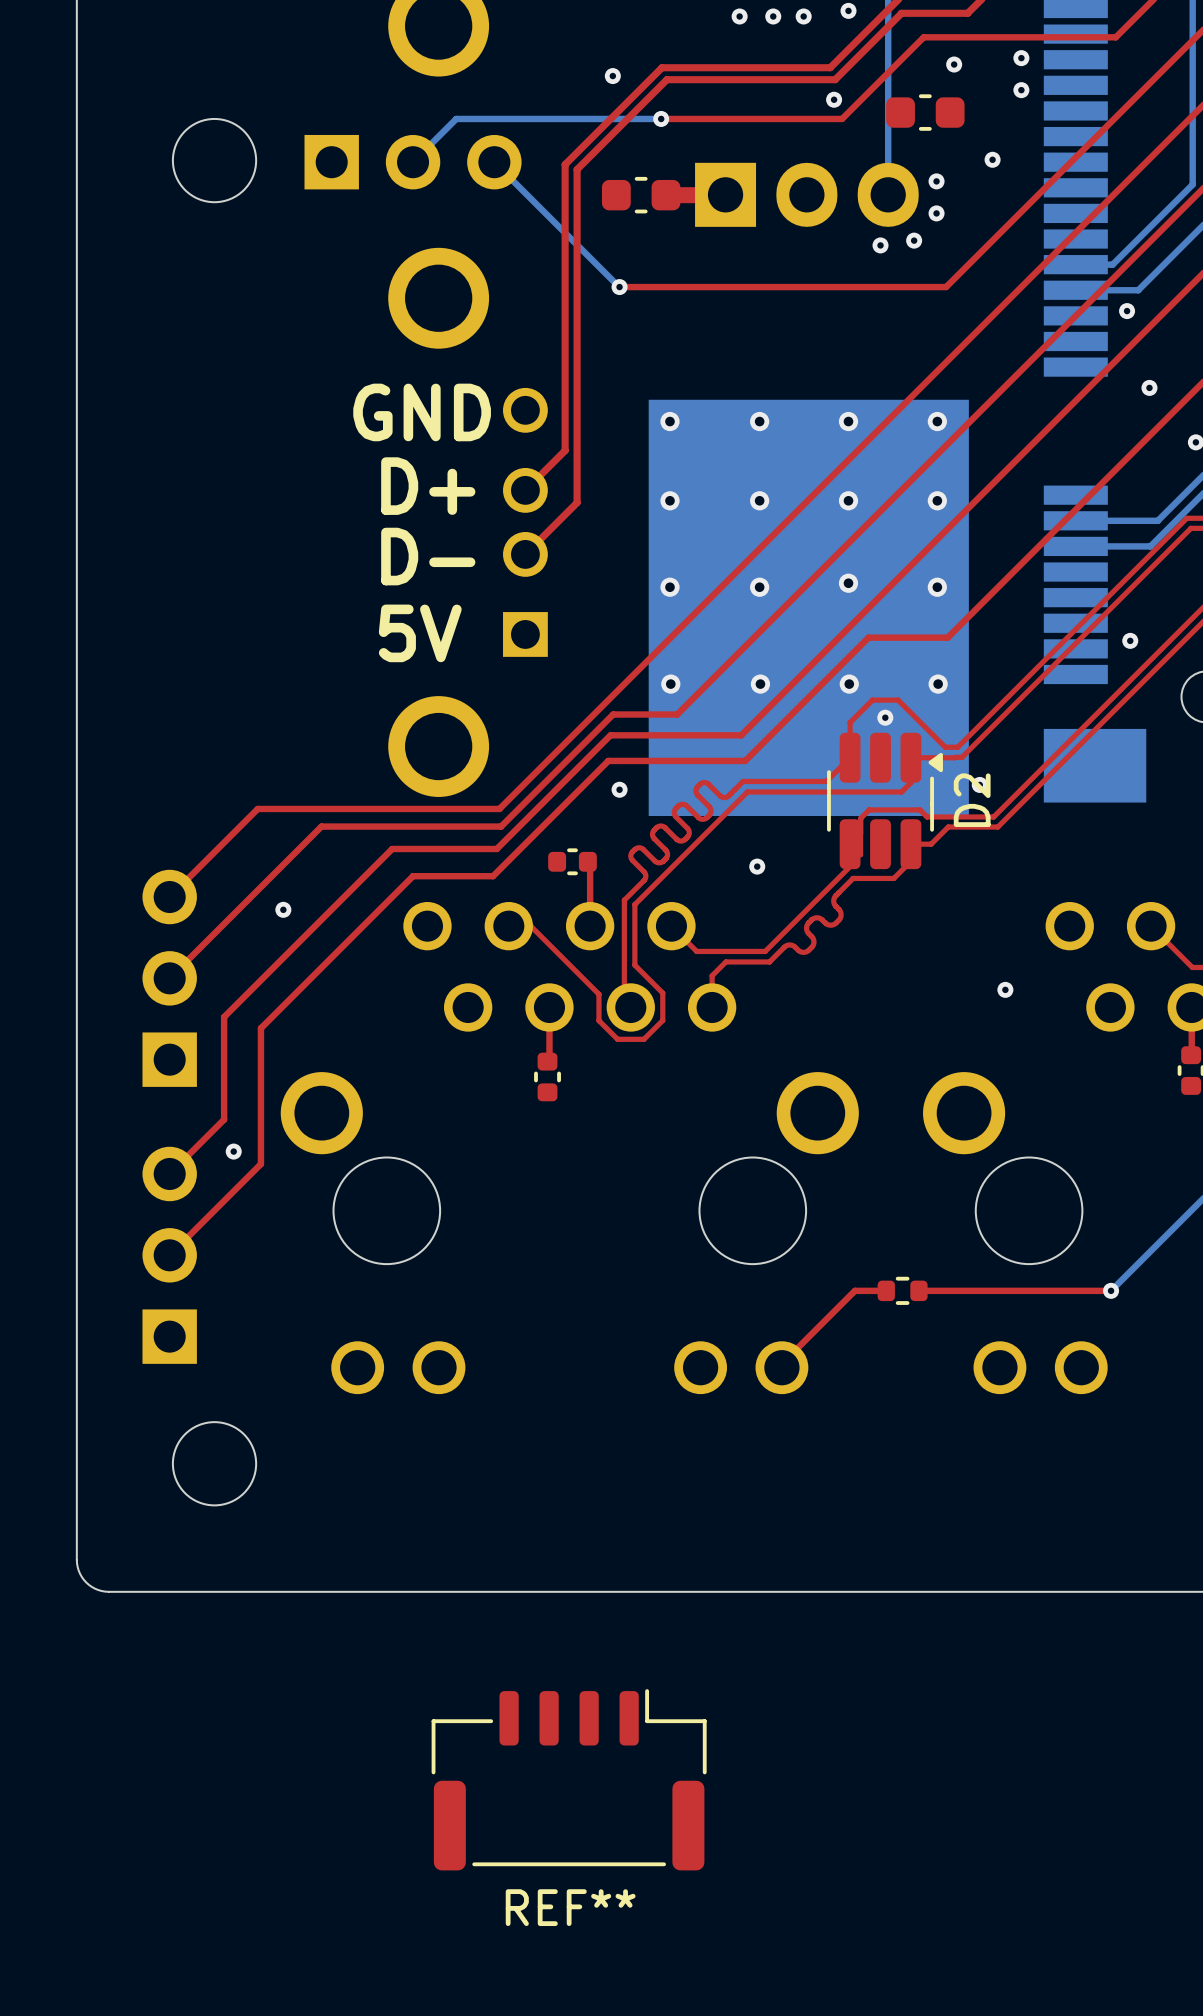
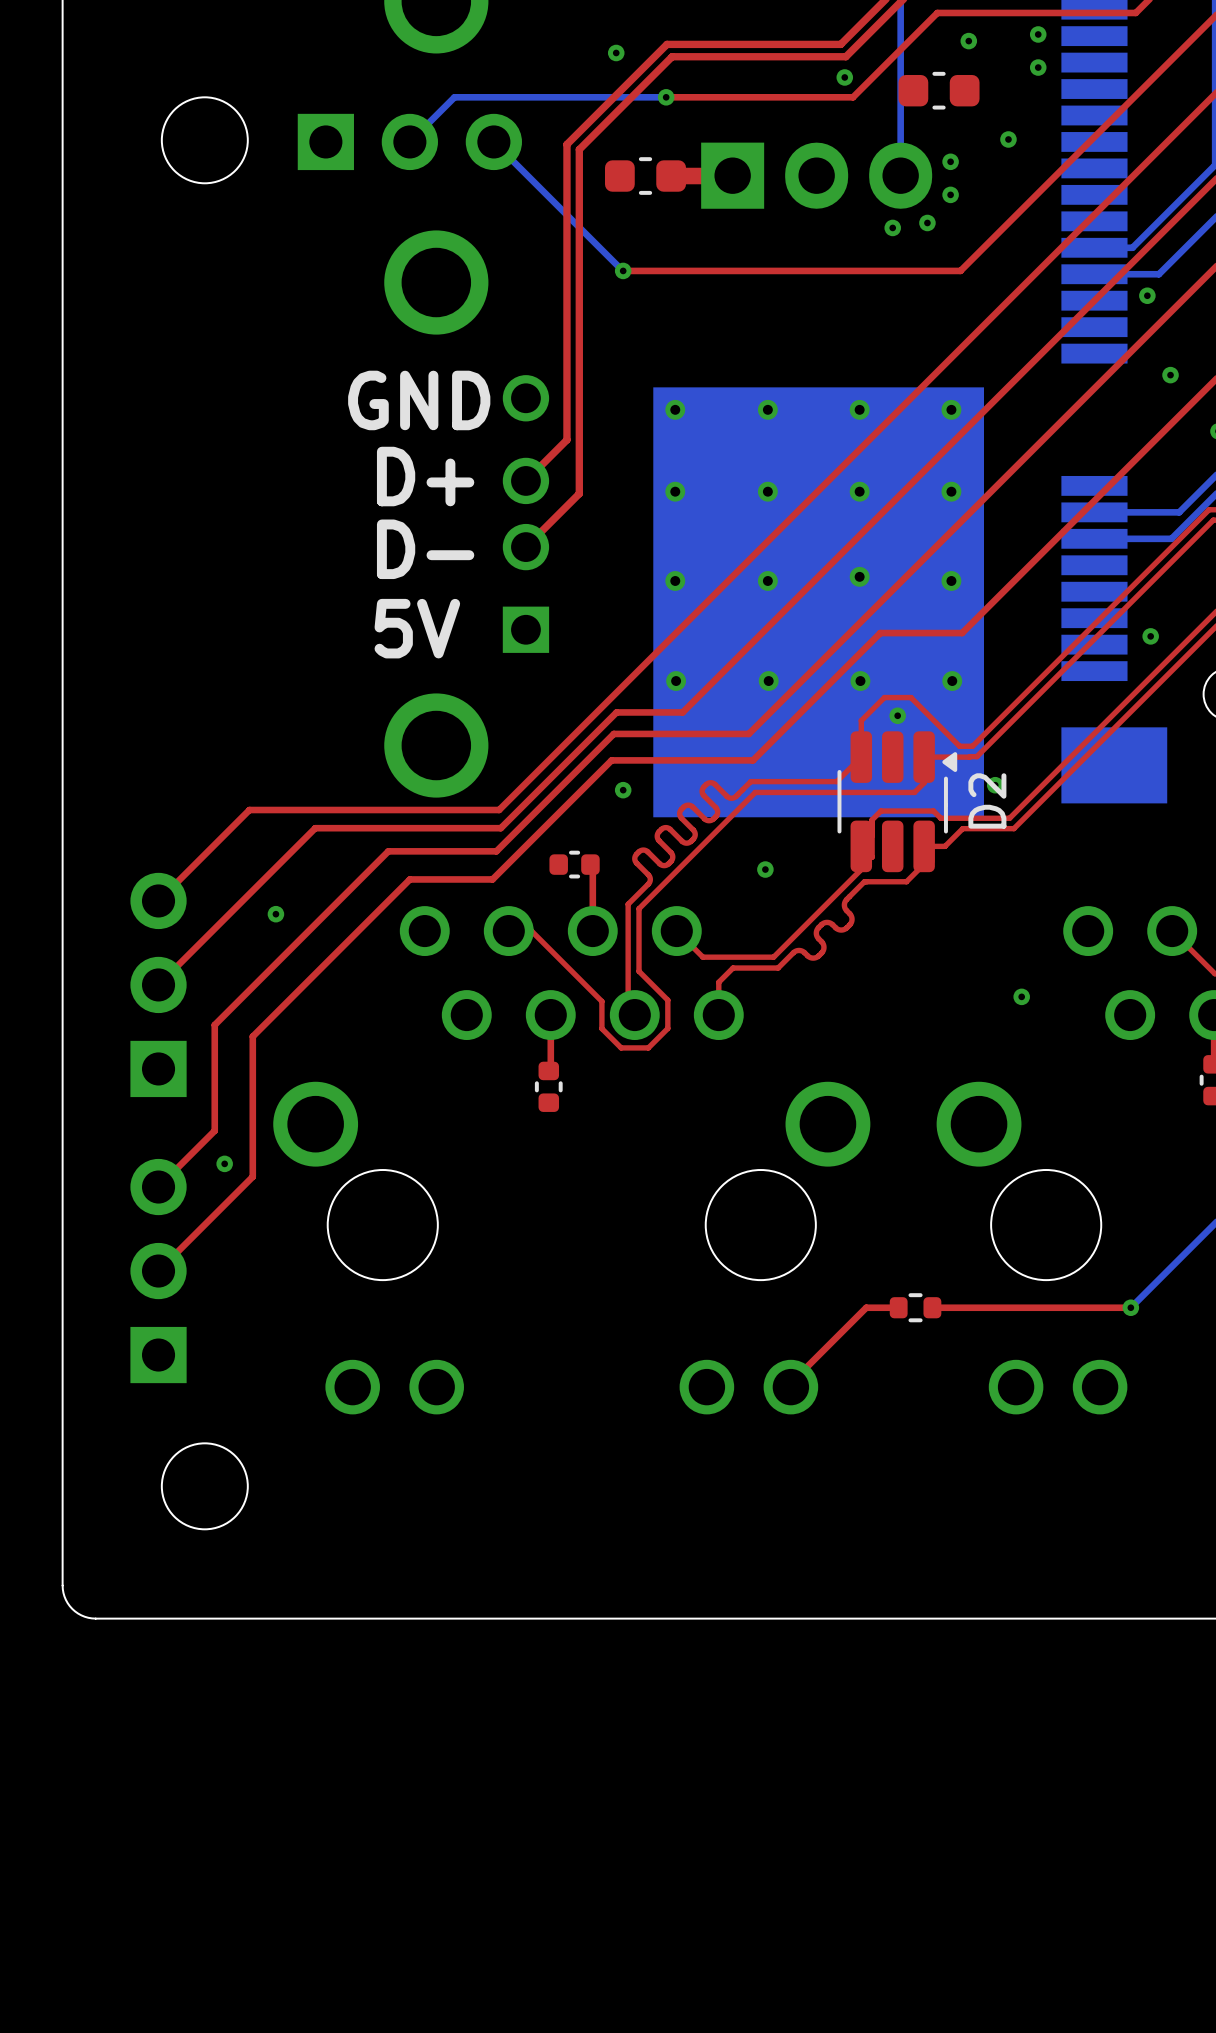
REF**: (569, 1779) -> none

